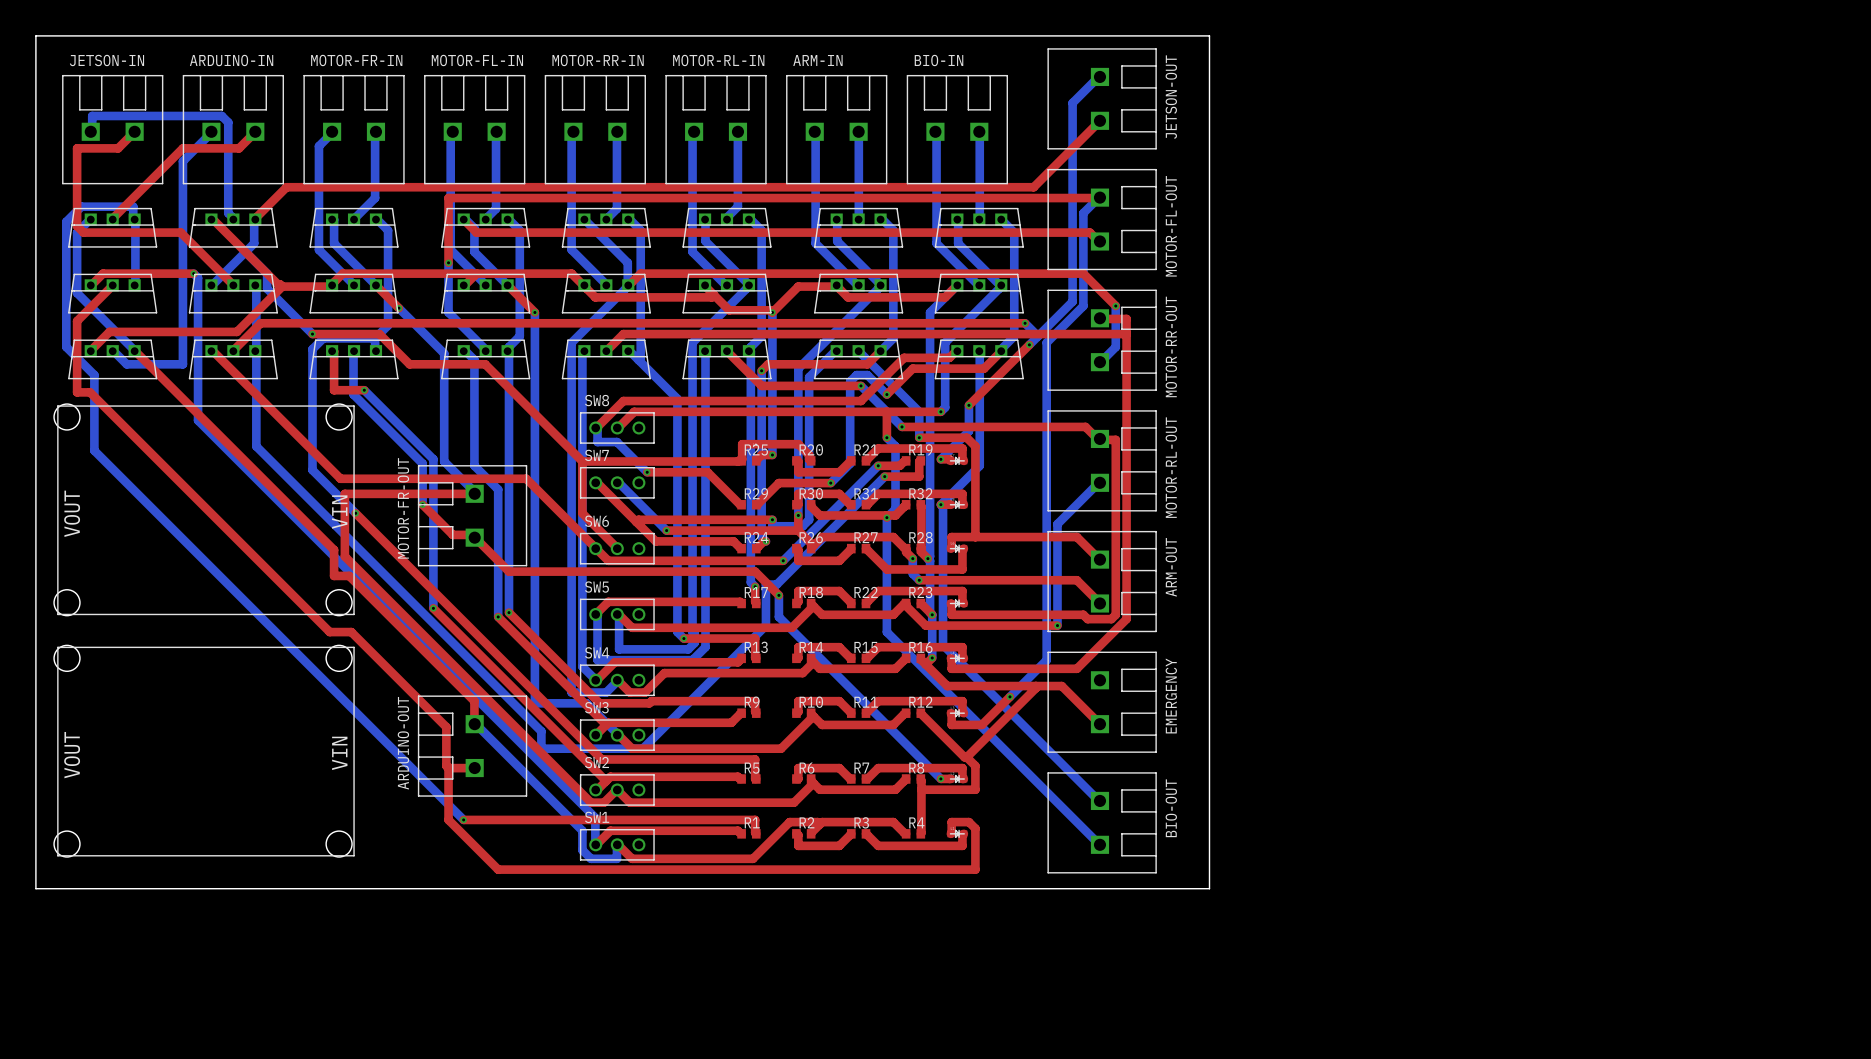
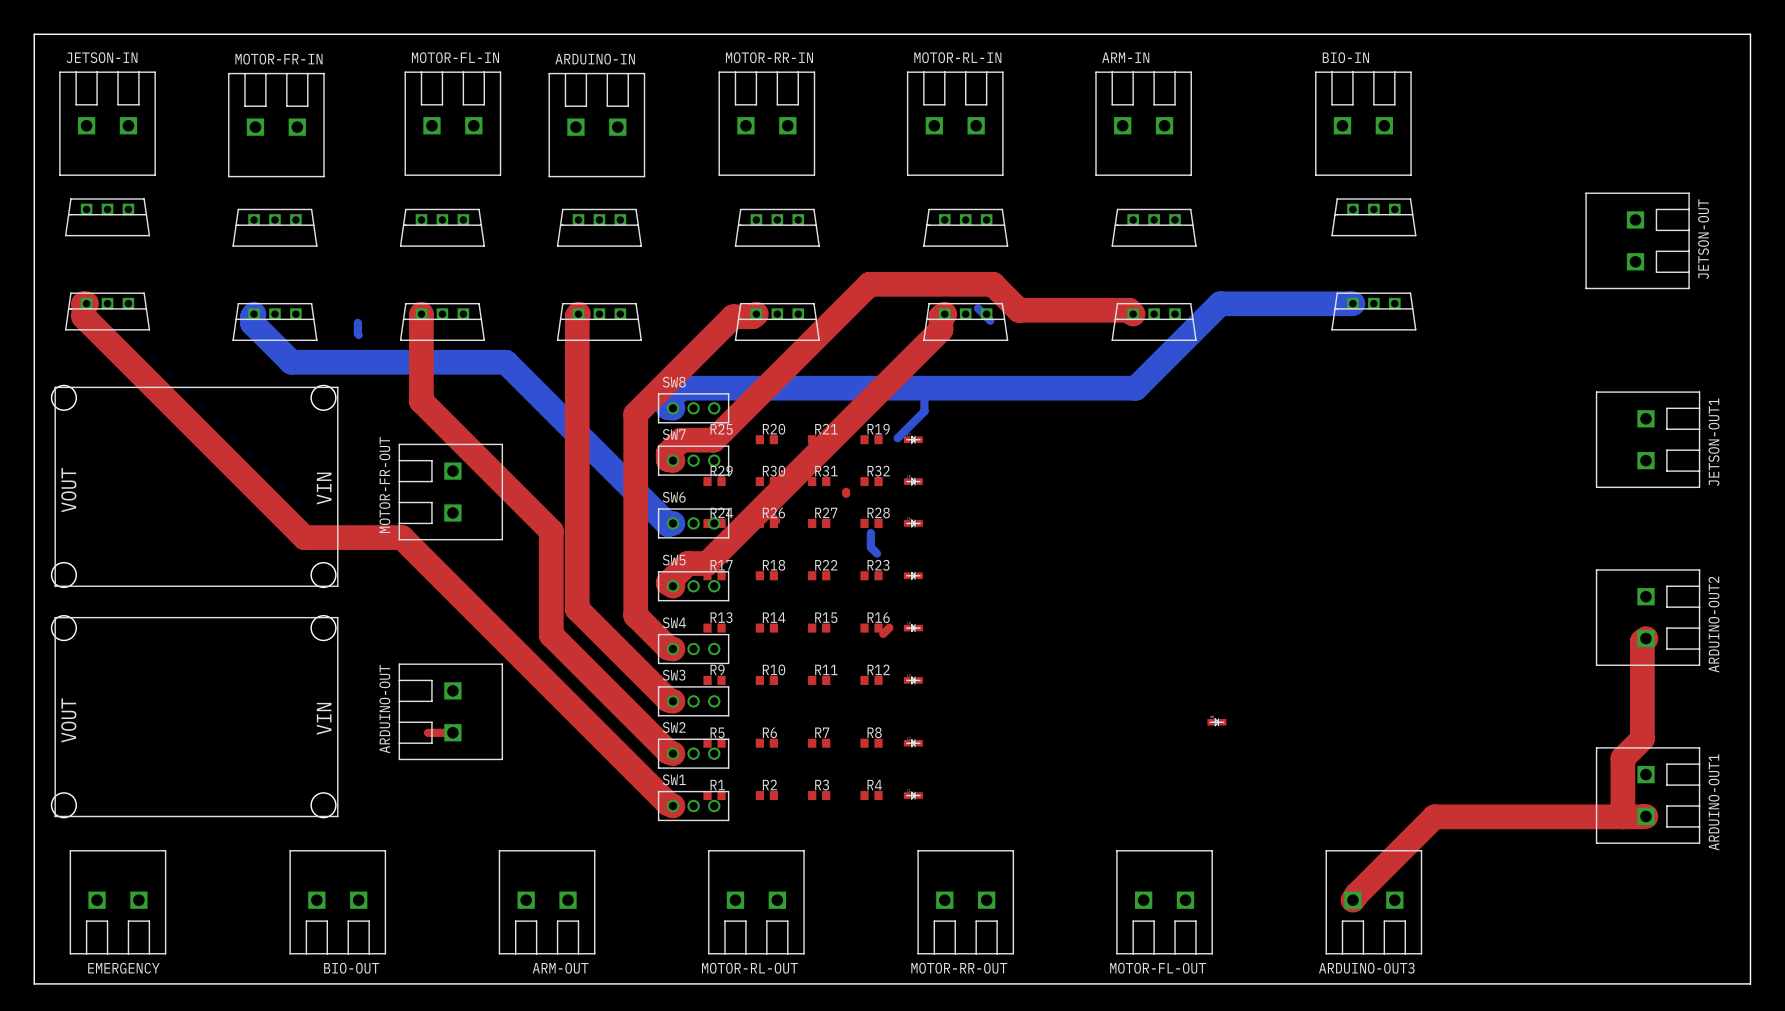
board edge: (1209, 35) (1209, 888) (35, 888) -> (1153, 34) (1750, 34) (1750, 983) (34, 983) (34, 847)
bottom track: (1099, 76) (1072, 103) (1072, 301) (1029, 344) -> none
JETSON-OUT: (1102, 98) -> none
top track: (1099, 120) (1033, 187) (286, 187) (255, 219) -> none
ARDUINO-IN: (233, 129) -> none
MOTOR-FR-IN position: (354, 129) -> (276, 125)
MOTOR-RR-IN position: (595, 129) -> (766, 123)
MOTOR-RL-IN: (716, 129) -> none
ARM-IN: (836, 129) -> none
BIO-IN: (957, 129) -> none
MOTOR-RL-IN: none -> (955, 123)
ARM-IN: none -> (1143, 123)
BIO-IN: none -> (1363, 123)
bottom track: (90, 131) (92, 115) (221, 115) (228, 122) (228, 213) (233, 219) -> none
top track: (134, 131) (118, 148) (77, 148) (77, 226) (83, 232) (180, 232) (233, 285) -> none
bottom track: (211, 131) (182, 161) (182, 364) (126, 364) (112, 351) -> none
top track: (255, 131) (239, 148) (182, 148) (112, 219) -> none
bottom track: (332, 131) (318, 146) (318, 249) (354, 285) -> none
bottom track: (375, 131) (375, 198) (354, 219) -> none
bottom track: (452, 131) (450, 133) (450, 249) (485, 285) -> none
bottom track: (496, 131) (496, 208) (485, 219) -> none
bottom track: (573, 131) (571, 133) (571, 249) (606, 285) -> none
bottom track: (617, 131) (616, 208) (606, 219) -> none
ARDUINO-IN: none -> (596, 125)
bottom track: (694, 131) (692, 133) (692, 252) (727, 285) -> none
bottom track: (737, 131) (737, 206) (727, 219) -> none
bottom track: (814, 131) (815, 243) (858, 285) -> none
bottom track: (858, 131) (858, 219) -> none
bottom track: (935, 131) (936, 243) (979, 285) -> none
bottom track: (979, 131) (979, 219) -> none
top track: (1099, 197) (448, 198) (448, 262) -> none
bottom track: (1099, 197) (1083, 213) (1083, 306) (1046, 342) (1046, 660) (1009, 696) -> none
bottom track: (90, 219) (77, 232) (77, 293) (134, 351) -> none
top track: (211, 219) (282, 286) -> none
bottom track: (255, 219) (254, 243) (211, 285) -> none
bottom track: (332, 219) (334, 219) (334, 243) (375, 285) -> none
bottom track: (375, 219) (388, 230) (388, 325) (375, 338) (323, 338) (312, 349) (312, 470) (355, 513) -> none
top track: (463, 219) (476, 232) (1089, 232) (1099, 241) -> none
bottom track: (463, 219) (474, 228) (474, 252) (507, 285) -> none
bottom track: (507, 219) (519, 230) (519, 336) (508, 347) (507, 351) (508, 612) -> none
bottom track: (584, 219) (627, 262) (628, 285) (571, 342) (571, 692) (606, 692) (617, 680) -> none
bottom track: (628, 219) (640, 230) (640, 357) (638, 360) -> none
bottom track: (705, 219) (705, 241) (748, 285) (692, 342) (692, 632) (694, 634) (694, 642) (688, 649) (619, 649) (619, 614) (617, 614) -> none
bottom track: (748, 219) (761, 230) (761, 336) (748, 351) (750, 351) (750, 582) (755, 586) -> none
bottom track: (836, 219) (837, 241) (880, 285) (798, 368) (798, 515) -> none
bottom track: (880, 219) (893, 230) (893, 338) (880, 351) -> none
bottom track: (957, 219) (958, 243) (1001, 285) (945, 342) (945, 407) (940, 411) -> none
bottom track: (1001, 219) (1014, 232) (1014, 336) (1001, 351) -> none
MOTOR-FL-OUT: (1102, 219) -> none
part: (233, 227) -> none
part: (354, 227) -> none
part position: (485, 227) -> (442, 227)
part position: (606, 227) -> (599, 227)
part: (727, 227) -> none
part: (858, 227) -> none
part: (979, 227) -> none
part: none -> (1373, 217)
part: none -> (274, 227)
part: none -> (777, 227)
part: none -> (965, 227)
part: none -> (1154, 227)
bottom track: (245, 252) (267, 273) (267, 288) (312, 334) -> none
JETSON-OUT: none -> (1637, 240)
bottom track: (448, 262) (448, 312) (485, 351) -> none
via: (448, 262) -> none
top track: (193, 273) (103, 273) (90, 285) -> none
bottom track: (193, 273) (198, 277) (198, 420) (595, 817) (595, 844) -> none
via: (193, 273) -> none
top track: (474, 275) (472, 273) (342, 273) (331, 286) (282, 286) -> none
top track: (112, 285) (77, 321) (77, 392) (90, 392) (329, 632) (351, 632) (446, 727) (448, 819) (498, 869) (975, 869) (975, 828) (968, 822) (951, 822) (950, 833) -> none
bottom track: (134, 285) (135, 223) (133, 206) (81, 206) (66, 221) (66, 347) (94, 375) (94, 450) (463, 819) -> none
bottom track: (255, 285) (256, 446) (541, 731) (541, 748) (642, 748) (765, 625) (765, 584) (776, 584) (884, 476) -> none
top track: (375, 285) (398, 308) -> none
top track: (463, 285) (476, 273) (571, 273) (595, 297) (711, 297) (714, 295) -> none
top track: (507, 285) (534, 312) -> none
top track: (628, 285) (640, 273) (1083, 273) (1115, 306) -> none
top track: (705, 285) (729, 310) (770, 310) (772, 312) (798, 286) (836, 285) (848, 297) (945, 297) (957, 285) -> none
bottom track: (957, 285) (930, 312) (930, 556) (927, 558) (930, 560) (932, 657) -> none
top track: (282, 286) (236, 331) (109, 331) (90, 351) -> none
part: (112, 293) -> none
part: (233, 293) -> none
part: (354, 293) -> none
part: (485, 293) -> none
part: (606, 293) -> none
part: (727, 293) -> none
part: (858, 293) -> none
part: (979, 293) -> none
bottom track: (1115, 306) (1115, 347) (1099, 362) -> none
via: (1115, 306) -> none
bottom track: (398, 308) (444, 353) (444, 461) (474, 493) -> none
via: (398, 308) -> none
bottom track: (534, 312) (534, 703) (586, 703) (617, 735) -> none
via: (534, 312) -> none
bottom track: (772, 312) (772, 455) -> none
via: (772, 312) -> none
top track: none -> (86, 303) (83, 303) (83, 316) (304, 537) (401, 537) (668, 803) (673, 806)
top track: (1099, 318) (1126, 318) (1126, 619) (1076, 668) (951, 668) (950, 658) -> none
bottom track: none -> (1352, 303) (1220, 303) (1135, 388) (681, 388) (668, 401) (668, 407) (673, 408)
top track: (1025, 323) (260, 323) (233, 351) -> none
via: (1025, 323) -> none
part: none -> (107, 311)
part: none -> (1373, 311)
bottom track: none -> (254, 314) (252, 323) (291, 362) (505, 362) (668, 524) (673, 523)
top track: none -> (421, 314) (421, 401) (551, 531) (551, 635) (668, 751) (673, 753)
top track: none -> (578, 314) (577, 609) (668, 699) (673, 701)
top track: none -> (756, 314) (752, 316) (733, 316) (635, 414) (635, 615) (668, 647) (673, 649)
top track: none -> (944, 314) (940, 316) (940, 329) (707, 563) (687, 563) (668, 583) (673, 586)
top track: none -> (1133, 314) (1129, 310) (1018, 310) (992, 284) (869, 284) (713, 440) (681, 440) (668, 453) (668, 459) (673, 460)
top track: (312, 334) (379, 334) (409, 364) (485, 364) (582, 461) -> none
via: (312, 334) -> none
top track: (1126, 334) (623, 334) (606, 351) -> none
part: none -> (274, 321)
part: none -> (442, 321)
part: none -> (599, 321)
part: none -> (777, 321)
part: none -> (965, 321)
part: none -> (1154, 321)
MOTOR-RR-OUT: (1102, 340) -> none
top track: (1029, 344) (968, 405) -> none
via: (1029, 344) -> none
top track: (134, 351) (334, 550) (334, 575) (349, 575) (474, 701) (474, 724) -> none
top track: (211, 351) (340, 478) (526, 478) (608, 560) (783, 560) -> none
top track: (332, 351) (334, 351) (334, 390) (364, 390) -> none
bottom track: (354, 351) (353, 394) (422, 463) (422, 504) -> none
bottom track: (463, 351) (474, 360) (474, 465) (498, 489) (498, 616) -> none
bottom track: (584, 351) (582, 351) (582, 666) (595, 680) -> none
bottom track: (628, 351) (677, 398) (677, 632) (683, 638) -> none
bottom track: (705, 351) (705, 647) (692, 660) (597, 660) (597, 614) (595, 614) -> none
top track: (727, 351) (761, 385) (860, 385) -> none
bottom track: (836, 351) (809, 377) (809, 519) (802, 526) (772, 526) (772, 519) -> none
bottom track: (858, 351) (919, 411) (919, 437) -> none
top track: (880, 351) (867, 364) (768, 364) (761, 370) -> none
top track: (957, 351) (949, 357) (904, 357) (860, 401) (623, 401) (595, 427) -> none
bottom track: (979, 351) (979, 465) (940, 504) (943, 506) (943, 645) (1099, 800) -> none
top track: (1001, 351) (984, 368) (912, 368) (886, 394) -> none
part: (112, 359) -> none
part: (233, 359) -> none
part: (354, 359) -> none
part: (485, 359) -> none
part: (606, 359) -> none
part: (727, 359) -> none
part: (858, 359) -> none
part: (979, 359) -> none
bottom track: (761, 370) (761, 537) (765, 541) -> none
via: (761, 370) -> none
bottom track: (860, 385) (902, 426) -> none
via: (860, 385) -> none
bottom track: (364, 390) (433, 459) (433, 608) -> none
via: (364, 390) -> none
bottom track: (886, 394) (867, 375) (856, 375) (850, 381) (850, 463) (830, 483) -> none
via: (886, 394) -> none
via: (968, 405) -> none
top track: (886, 411) (886, 437) -> none
top track: (940, 411) (634, 411) (617, 427) -> none
via: (940, 411) -> none
top track: (902, 426) (1085, 426) (1100, 439) (1115, 439) (1115, 614) (1111, 619) (1087, 619) (1083, 614) (951, 614) (950, 603) -> none
via: (902, 426) -> none
bottom track: (595, 427) (597, 429) (597, 442) (616, 442) (647, 472) -> none
SW8 position: (617, 427) -> (693, 408)
bottom track: (886, 437) (895, 446) (895, 508) (886, 517) (886, 632) (1099, 844) -> none
via: (886, 437) -> none
top track: (919, 437) (966, 437) (975, 446) (975, 537) -> none
via: (919, 437) -> none
top track: (772, 455) (761, 455) (756, 460) -> none
via: (772, 455) -> none
top track: (940, 459) (950, 460) -> none
via: (940, 459) -> none
top track: (796, 460) (798, 461) (798, 472) (839, 472) (851, 460) -> none
top track: (811, 460) (809, 455) (798, 444) (742, 444) (742, 459) (737, 461) (582, 461) -> none
top track: (865, 460) (878, 448) (962, 448) (963, 460) -> none
top track: (906, 460) (899, 465) (878, 465) -> none
top track: (920, 460) (919, 476) (884, 476) -> none
MOTOR-RL-OUT: (1102, 460) -> none
JETSON-OUT1: none -> (1648, 439)
top track: (582, 461) (582, 513) (617, 548) -> none
bottom track: (878, 465) (783, 560) -> none
via: (878, 465) -> none
top track: (647, 472) (707, 472) (741, 504) -> none
via: (647, 472) -> none
via: (884, 476) -> none
top track: (595, 482) (655, 541) (733, 541) (741, 548) -> none
bottom track: (617, 482) (666, 530) -> none
SW7 position: (617, 482) -> (693, 460)
bottom track: (1099, 482) (1057, 524) (1057, 625) -> none
top track: (830, 483) (778, 483) (756, 504) -> none
via: (830, 483) -> none
top track: (474, 493) (344, 493) (344, 556) (591, 802) (604, 802) (617, 789) (629, 802) (794, 802) (813, 783) -> none
top track: (422, 504) (452, 534) (472, 534) (508, 571) (755, 571) (778, 595) -> none
via: (422, 504) -> none
top track: (796, 504) (798, 504) (798, 493) (839, 493) (851, 504) -> none
top track: (811, 504) (819, 515) (895, 515) (906, 504) -> none
top track: (865, 504) (878, 493) (962, 493) (963, 504) -> none
top track: (920, 504) (920, 548) (921, 552) (927, 558) -> none
top track: (940, 504) (950, 504) -> none
via: (940, 504) -> none
top track: (355, 513) (601, 759) (755, 759) (756, 779) -> none
via: (355, 513) -> none
top track: (798, 515) (798, 530) (666, 530) -> none
via: (798, 515) -> none
via: (886, 517) -> none
top track: (772, 519) (638, 519) (636, 521) -> none
via: (772, 519) -> none
via: (666, 530) -> none
top track: (765, 541) (756, 548) -> none
via: (765, 541) -> none
SW6 position: (617, 548) -> (693, 523)
top track: (796, 548) (798, 550) (798, 560) (839, 560) (851, 548) -> none
top track: (811, 548) (822, 537) (893, 537) (906, 548) (906, 552) (912, 558) -> none
top track: (865, 548) (886, 569) (962, 569) (963, 548) -> none
top track: (950, 548) (951, 537) (1076, 537) (1099, 559) -> none
via: (912, 558) -> none
via: (927, 558) -> none
via: (783, 560) -> none
top track: (919, 580) (1076, 580) (1099, 603) -> none
via: (919, 580) -> none
ARM-OUT: (1102, 581) -> none
top track: (755, 586) (756, 603) -> none
via: (755, 586) -> none
bottom track: (778, 595) (778, 616) (940, 778) -> none
via: (778, 595) -> none
top track: (741, 603) (740, 601) (608, 601) (595, 614) -> none
top track: (796, 603) (798, 601) (798, 591) (839, 591) (851, 603) -> none
top track: (811, 603) (822, 614) (893, 614) (906, 603) (906, 606) (925, 625) (1057, 625) -> none
top track: (865, 603) (878, 591) (962, 591) (963, 603) -> none
top track: (920, 603) (932, 614) -> none
top track: (813, 606) (791, 627) (632, 627) (617, 614) -> none
top track: (433, 608) (606, 781) -> none
via: (433, 608) -> none
top track: (508, 612) (599, 703) (755, 701) (756, 713) -> none
via: (508, 612) -> none
SW5 position: (617, 614) -> (693, 586)
via: (932, 614) -> none
top track: (498, 616) (606, 724) -> none
via: (498, 616) -> none
via: (1057, 625) -> none
top track: (683, 638) (755, 638) (756, 658) -> none
via: (683, 638) -> none
ARDUINO-OUT2: none -> (1648, 617)
via: (932, 657) -> none
top track: (741, 658) (737, 662) (614, 662) (595, 680) -> none
top track: (796, 658) (798, 657) (798, 647) (839, 647) (851, 658) -> none
top track: (811, 658) (819, 668) (895, 668) (906, 658) -> none
top track: (865, 658) (878, 647) (962, 647) (963, 658) -> none
top track: (920, 658) (947, 686) (1061, 686) (1099, 724) -> none
top track: (813, 662) (802, 673) (664, 673) (645, 692) (629, 692) (617, 680) -> none
top track: none -> (1645, 638) (1642, 641) (1642, 738) (1622, 758) (1622, 816)
SW4 position: (617, 680) -> (693, 649)
top track: (1035, 686) (1035, 688) (966, 757) -> none
top track: (1009, 696) (981, 724) (951, 724) (950, 713) -> none
via: (1009, 696) -> none
EMERGENCY: (1102, 702) -> none
top track: (741, 713) (731, 722) (608, 722) (595, 735) -> none
top track: (796, 713) (798, 711) (798, 701) (839, 701) (851, 713) -> none
top track: (811, 713) (822, 724) (893, 724) (906, 713) -> none
top track: (865, 713) (878, 701) (962, 701) (963, 713) -> none
top track: (920, 713) (966, 757) -> none
top track: (813, 716) (781, 748) (632, 748) (617, 735) -> none
bottom track: (474, 724) (582, 830) (582, 850) (591, 858) (616, 858) (617, 844) -> none
SW3 position: (617, 735) -> (693, 701)
top track: (966, 757) (975, 765) (975, 789) (921, 789) -> none
part: none -> (1216, 722)
top track: (940, 778) (950, 779) -> none
via: (940, 778) -> none
top track: (741, 779) (737, 776) (610, 776) (595, 789) -> none
top track: (796, 779) (798, 778) (798, 768) (839, 768) (851, 779) -> none
top track: (811, 779) (819, 789) (895, 789) (906, 779) -> none
top track: (865, 779) (878, 768) (962, 768) (963, 779) -> none
top track: (920, 779) (920, 833) -> none
SW2 position: (617, 789) -> (693, 753)
top track: (463, 819) (755, 819) (756, 833) -> none
via: (463, 819) -> none
BIO-OUT: (1102, 822) -> none
top track: (819, 824) (817, 822) (789, 822) (753, 858) (632, 858) (617, 844) -> none
top track: (741, 833) (737, 830) (610, 830) (595, 844) -> none
top track: (796, 833) (798, 835) (798, 845) (839, 845) (851, 833) -> none
top track: (811, 833) (822, 822) (893, 822) (906, 833) -> none
top track: (865, 833) (878, 845) (962, 845) (963, 833) -> none
ARDUINO-OUT1: none -> (1648, 795)
SW1 position: (617, 844) -> (693, 806)
top track: none -> (1645, 816) (1434, 816) (1352, 900)
EMERGENCY: none -> (117, 902)
BIO-OUT: none -> (337, 902)
ARM-OUT: none -> (547, 902)
MOTOR-RL-OUT: none -> (756, 902)
MOTOR-RR-OUT: none -> (965, 902)
MOTOR-FL-OUT: none -> (1164, 902)
ARDUINO-OUT3: none -> (1373, 902)

